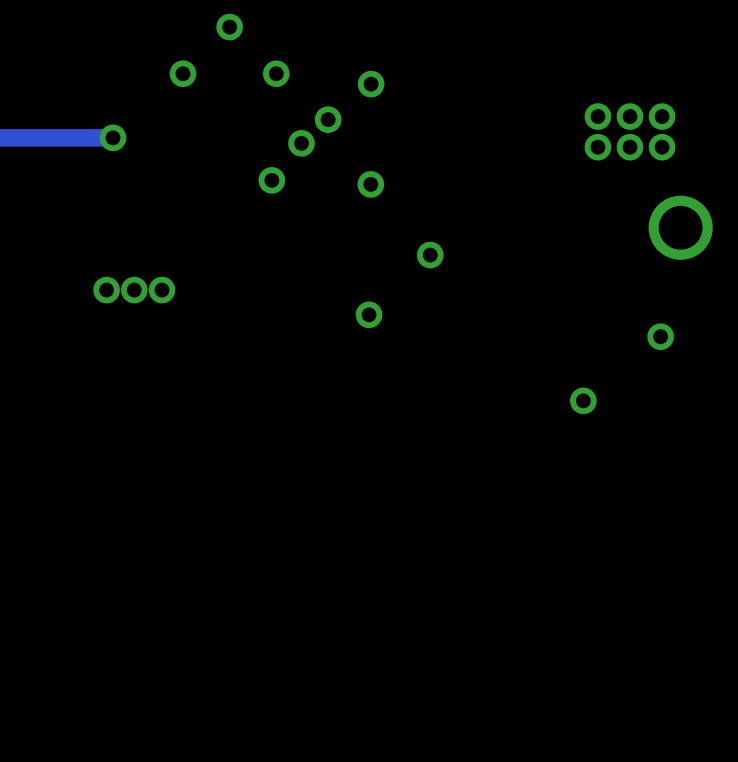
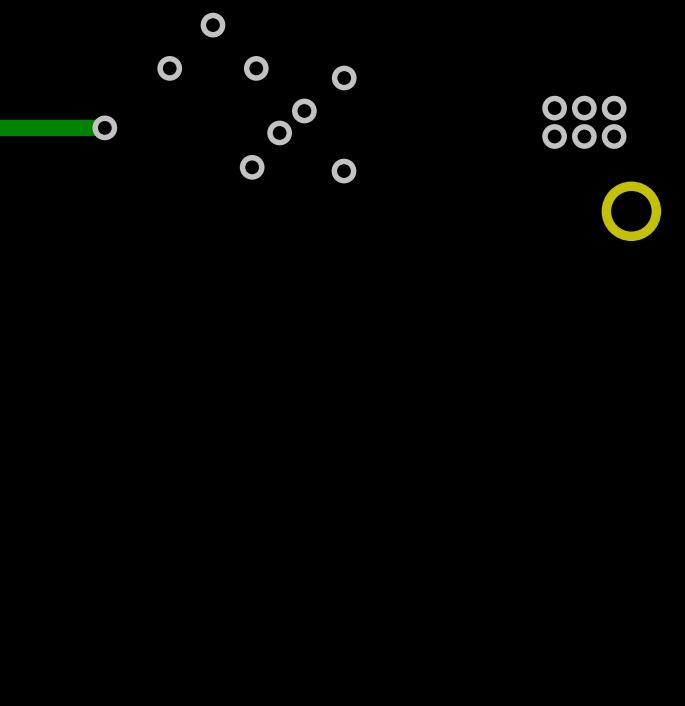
via: (430, 255) -> none
via: (106, 290) -> none
via: (134, 290) -> none
via: (162, 290) -> none
via: (369, 314) -> none
via: (660, 336) -> none
via: (583, 400) -> none

